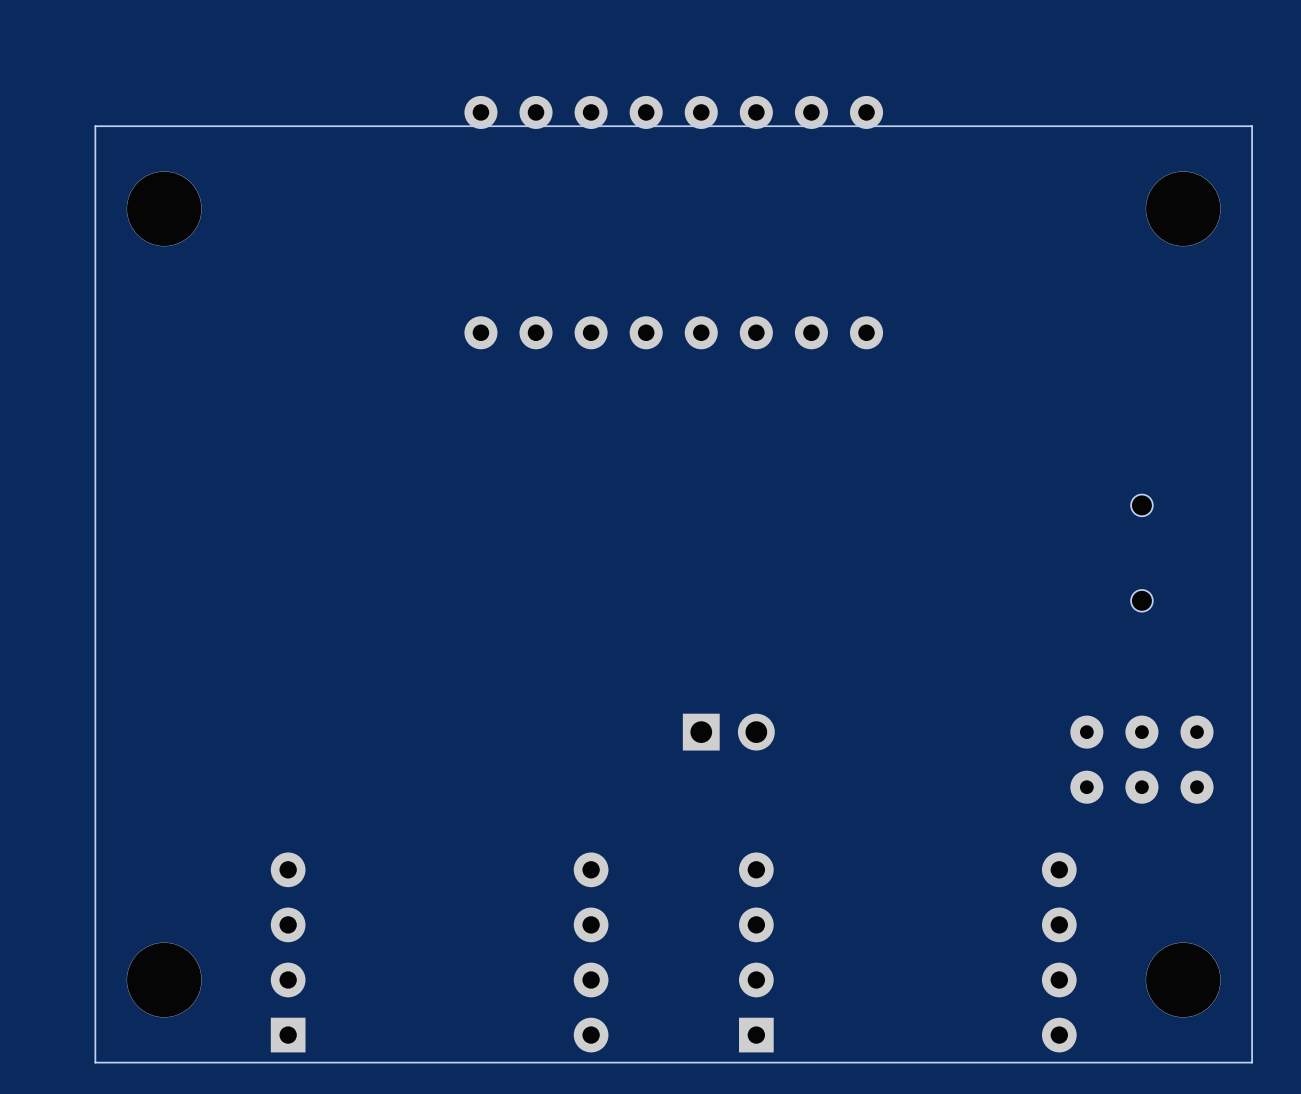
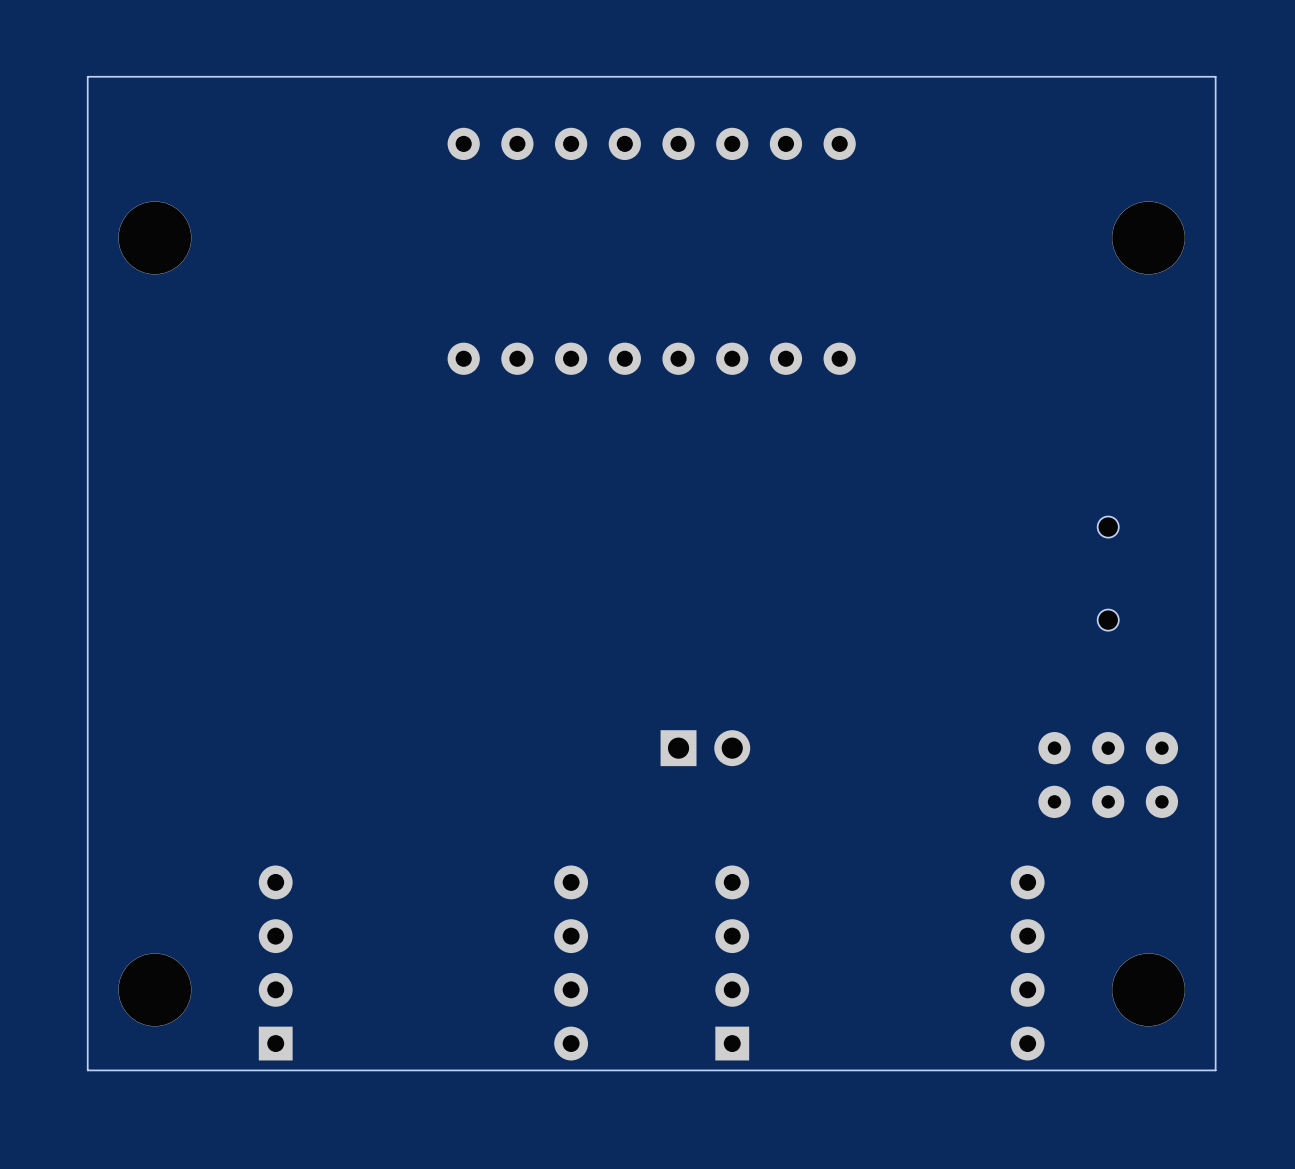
board edge: (1252, 126) (95, 126) -> (1215, 157) (1215, 76) (87, 76) (87, 157)

